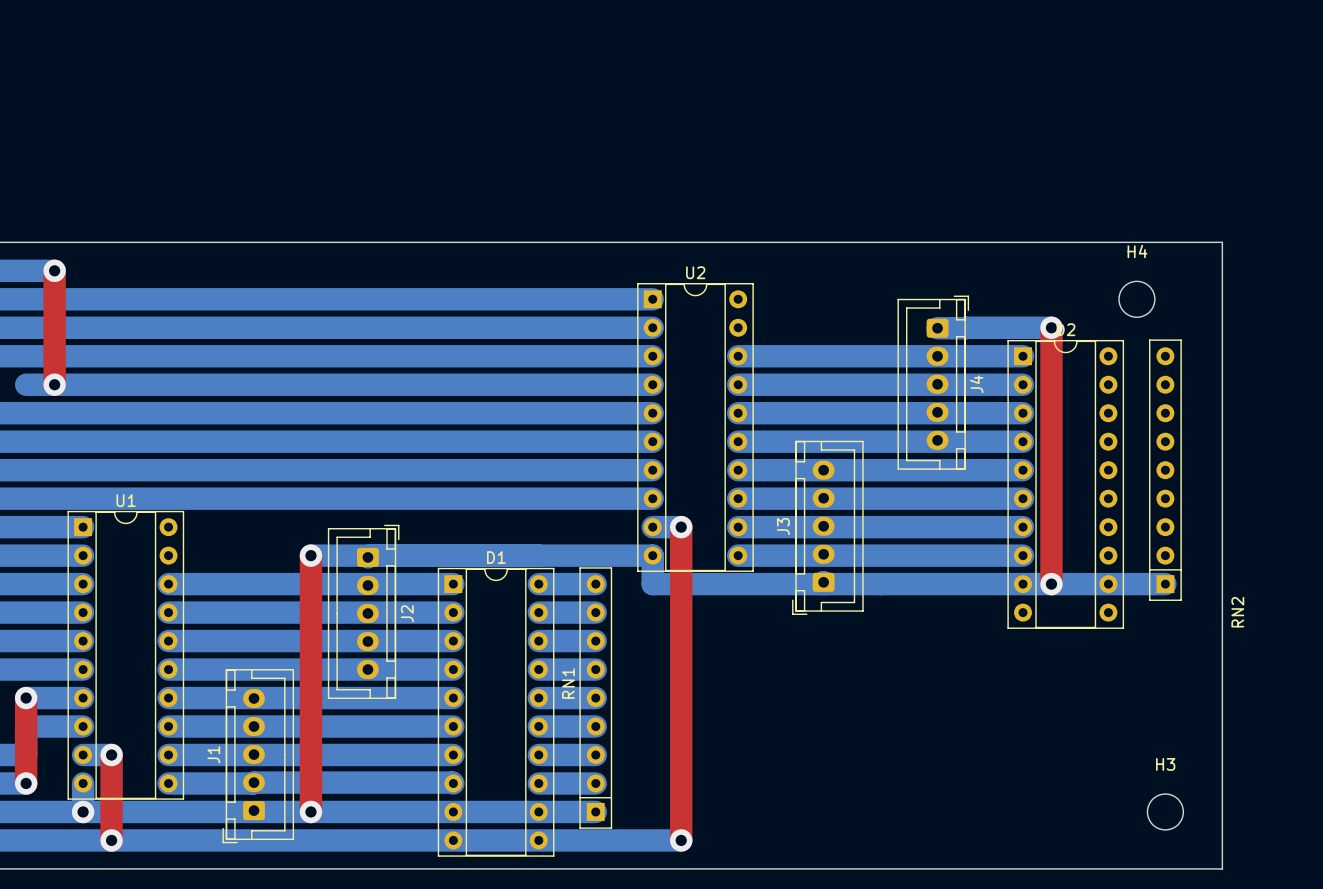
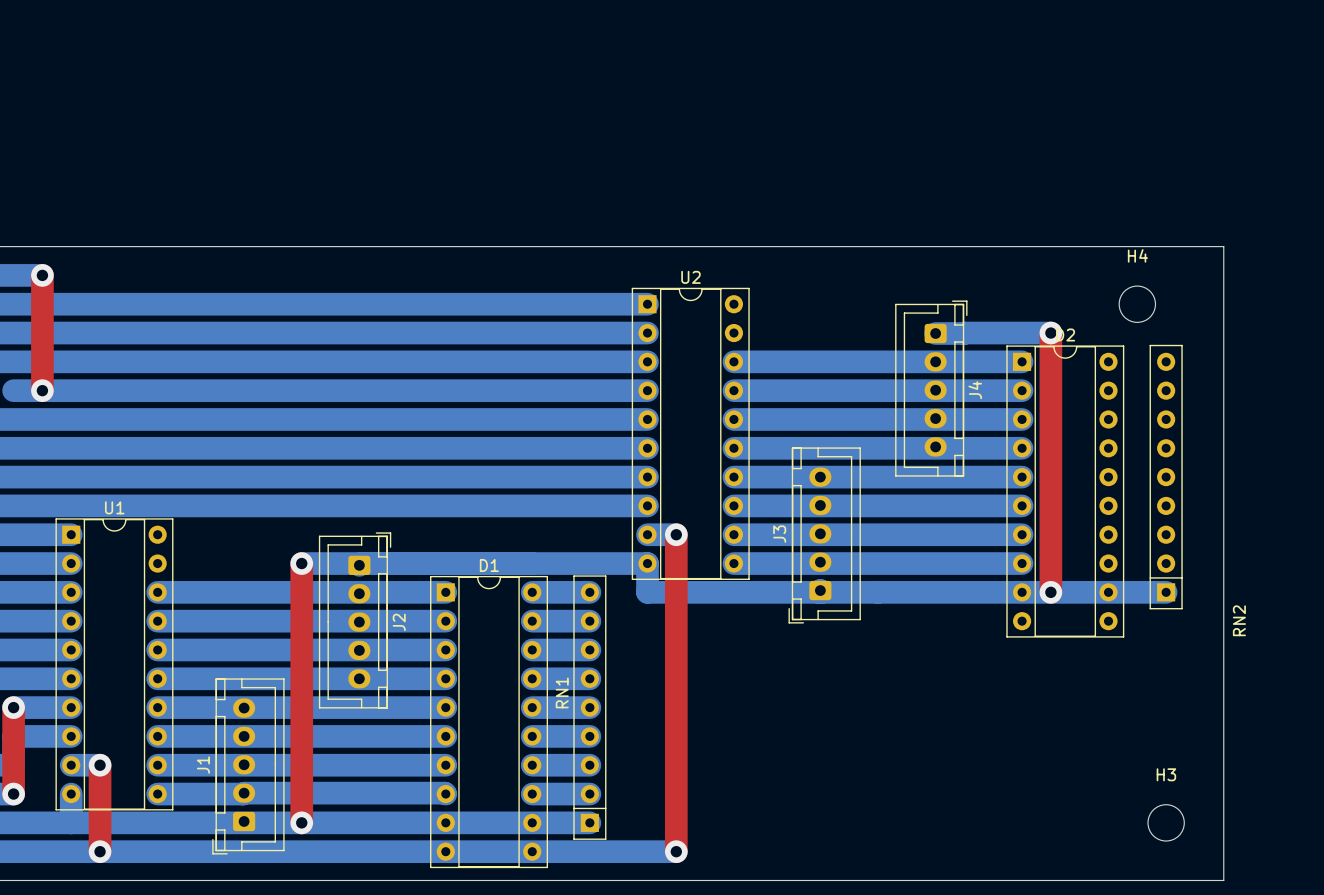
via: (83, 811) -> none

